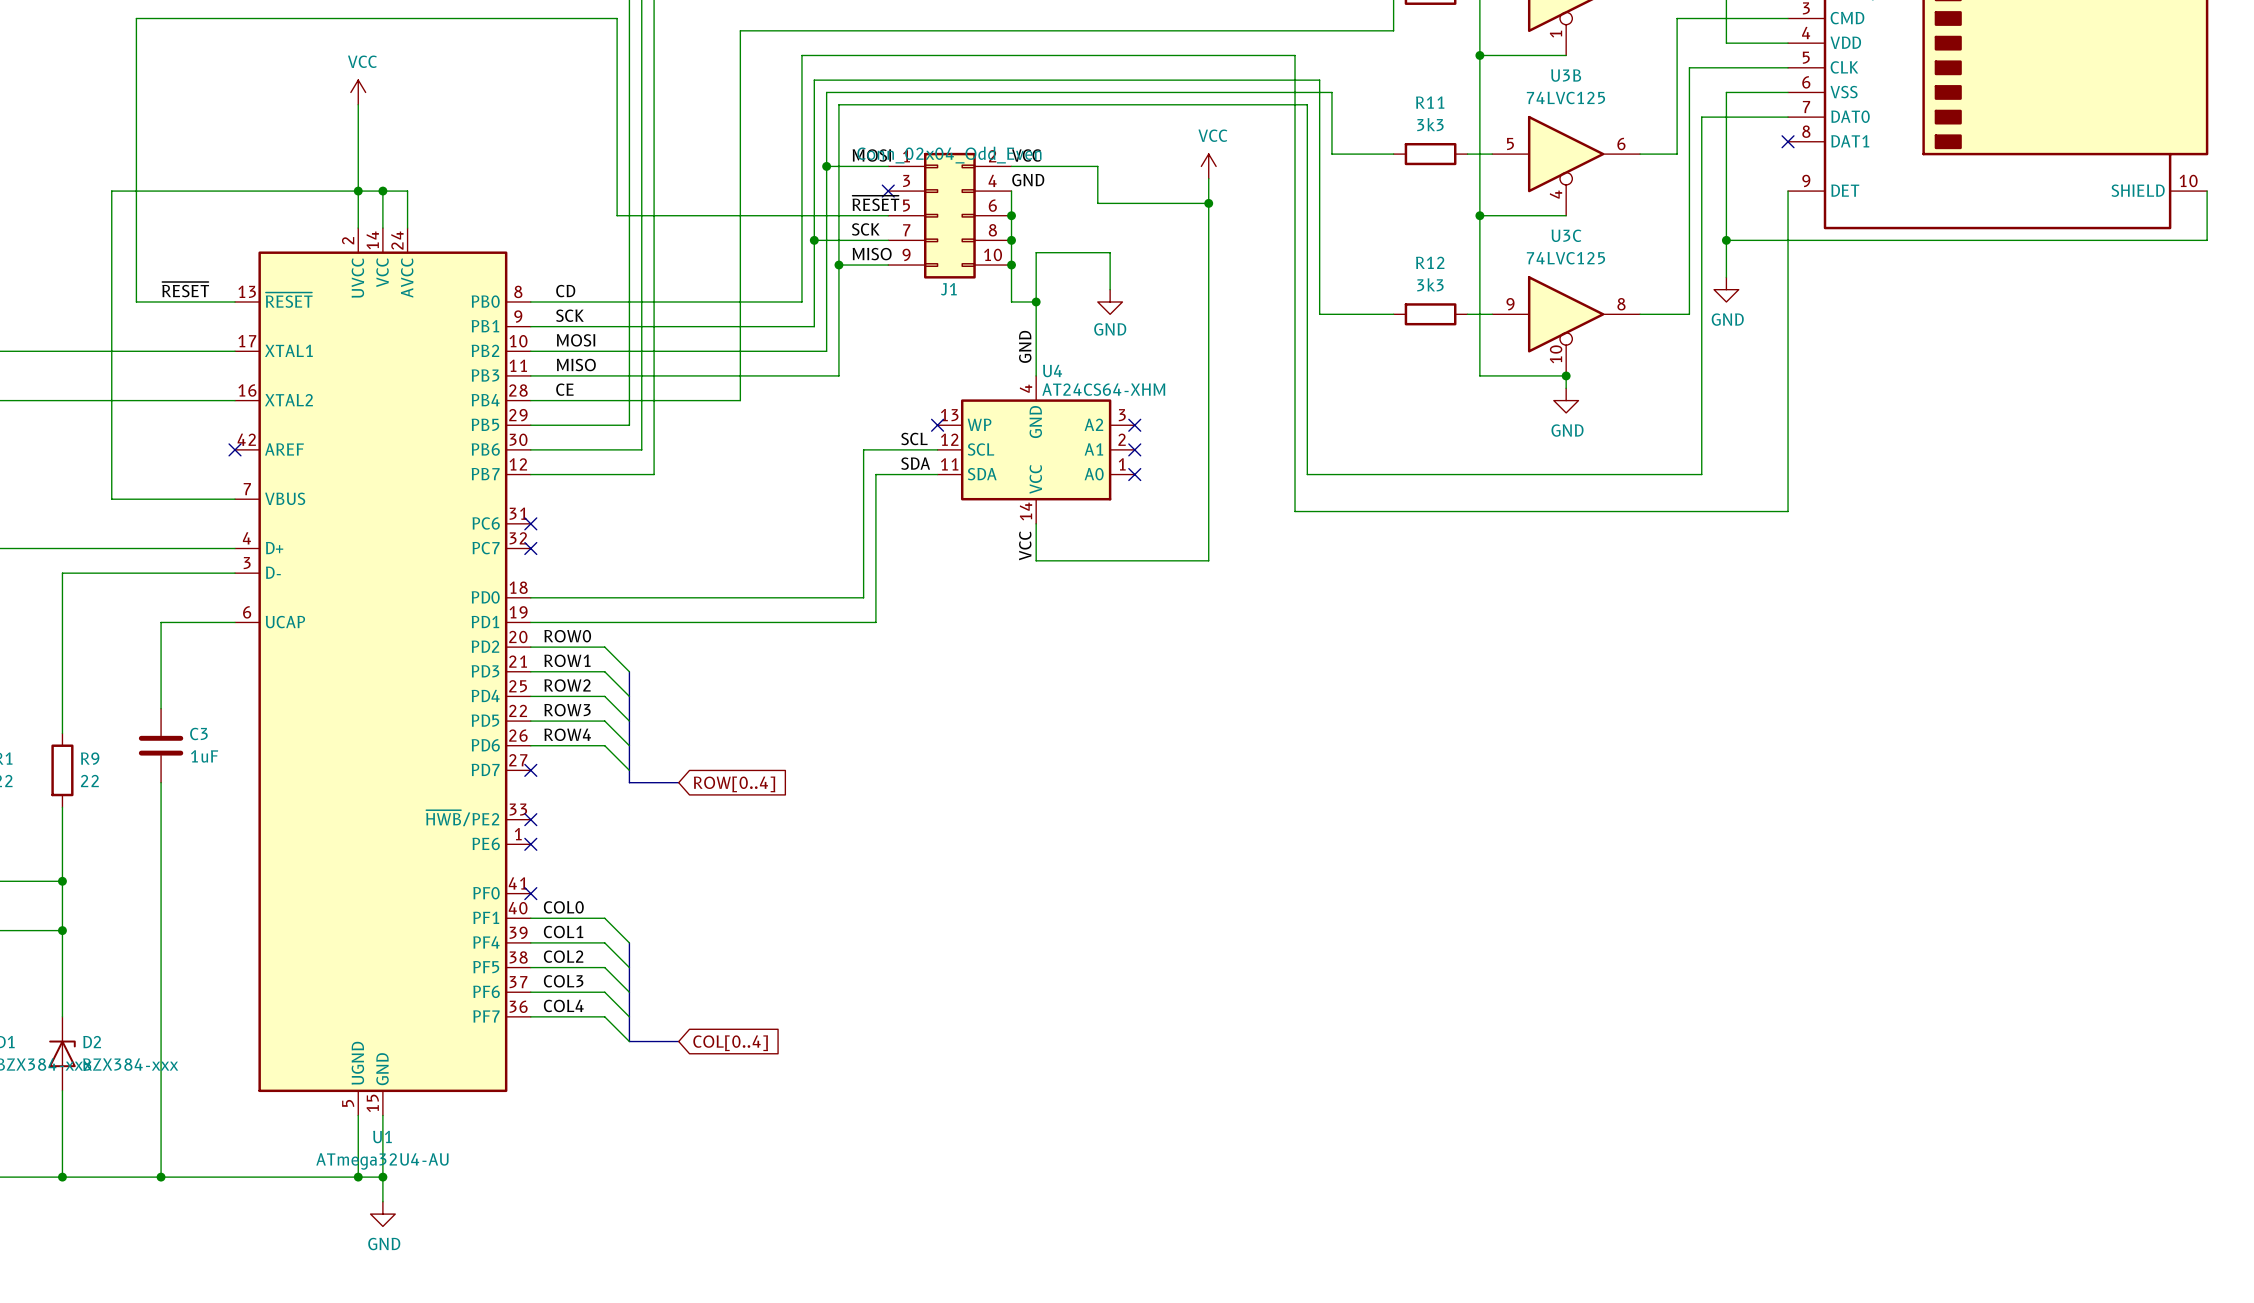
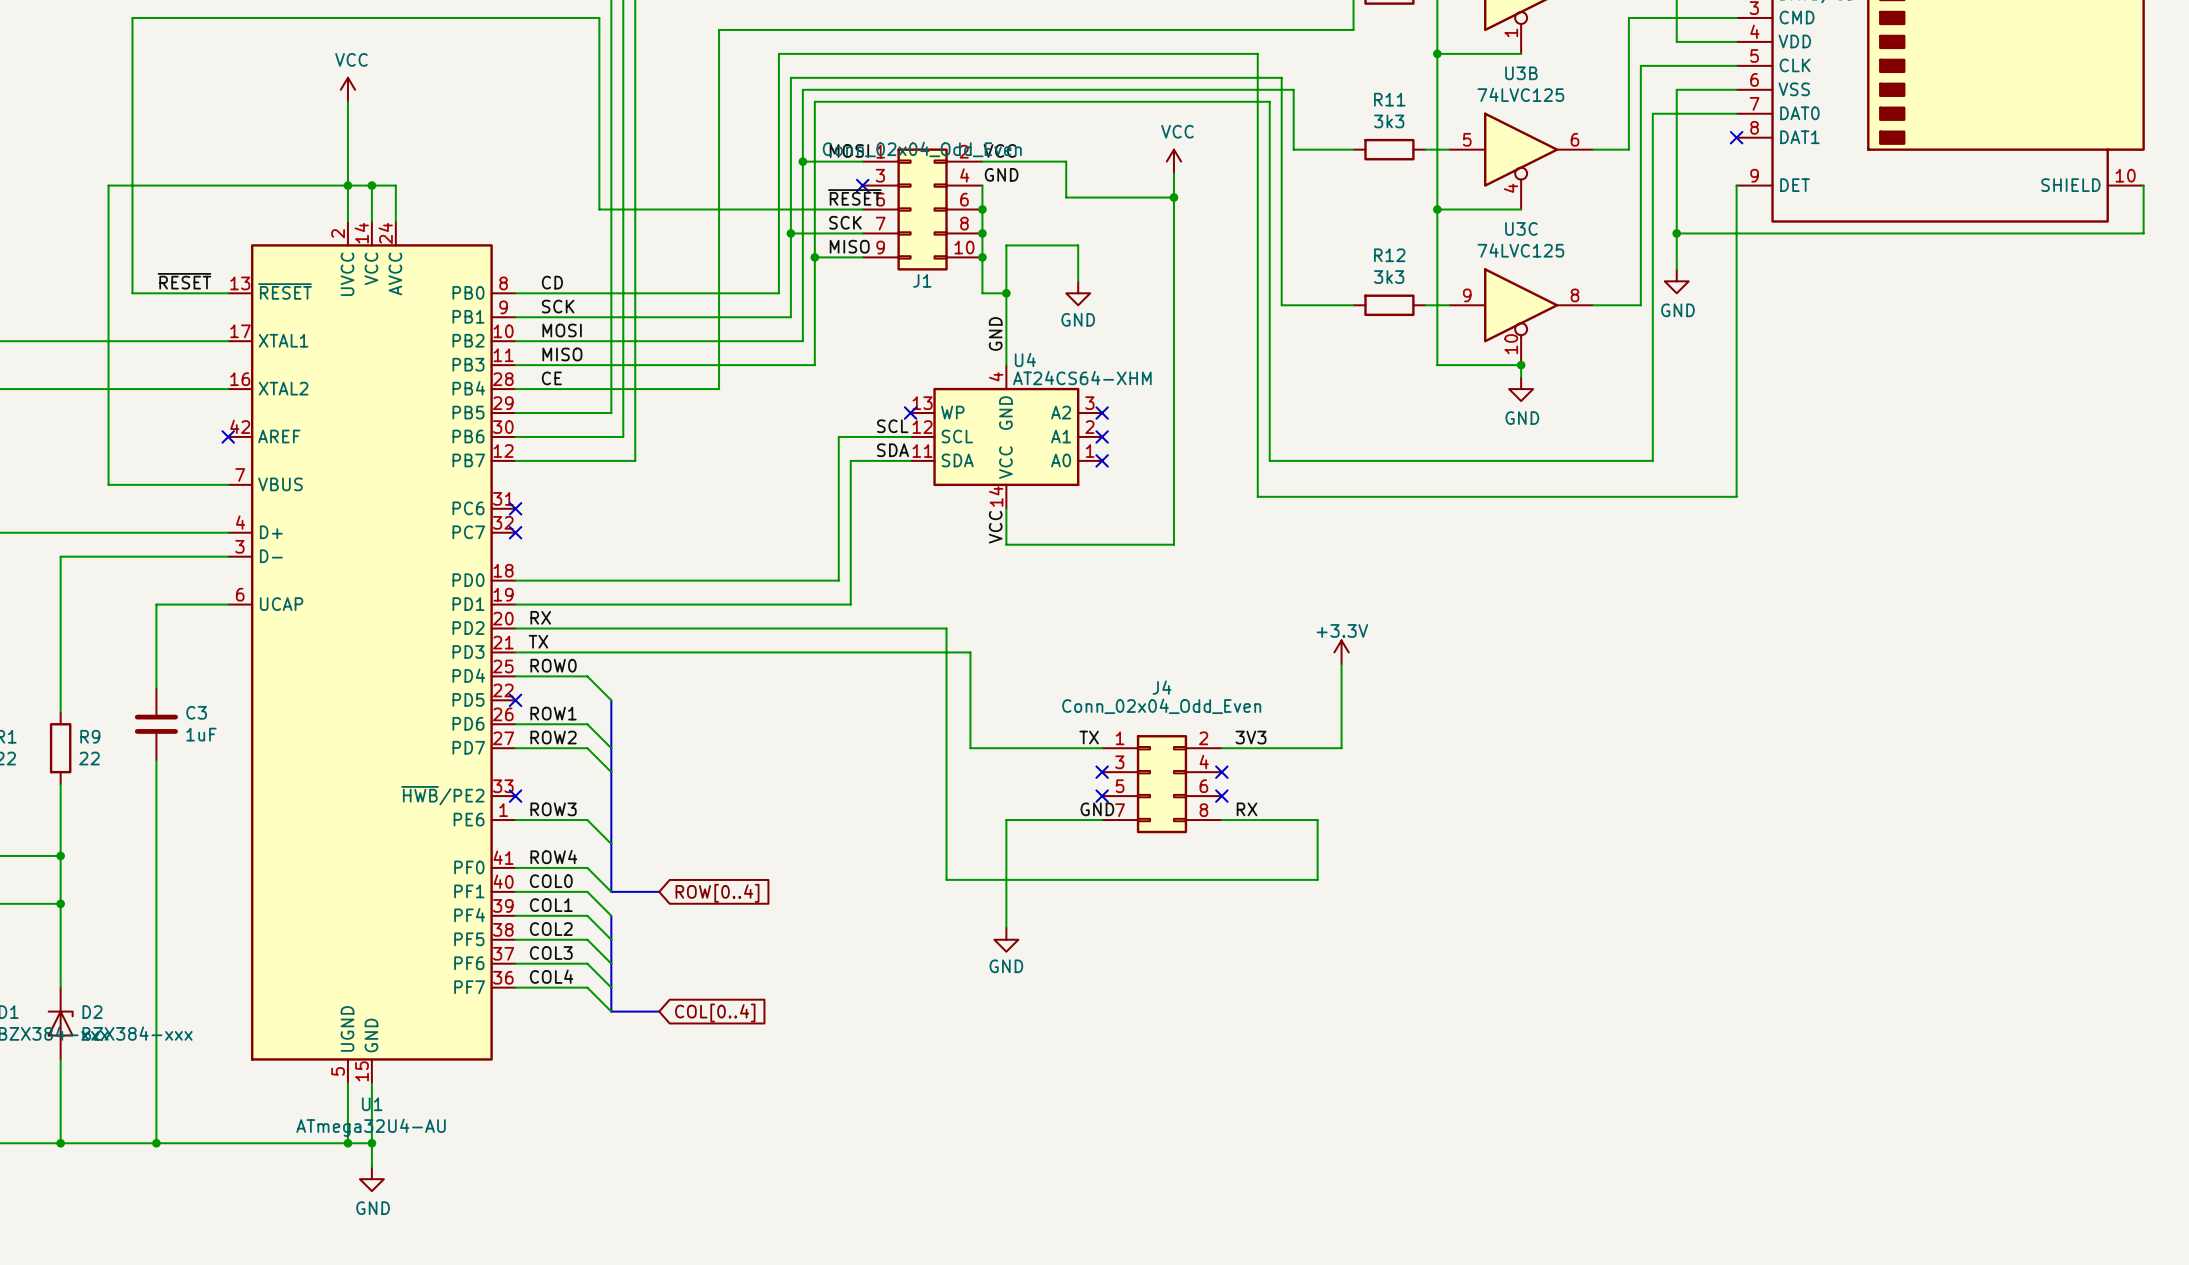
label: ROW0 (567, 636) -> RX (540, 617)
wire: (604, 647) (629, 671) -> (587, 628) (946, 628) (946, 879) (1317, 879) (1317, 820) (1221, 820)
label: ROW1 (567, 660) -> TX (538, 641)
wire: (604, 671) (629, 696) -> (587, 652) (970, 652) (970, 748) (1102, 748)
bus: (629, 671) (629, 721) -> none
power symbol: none -> +3.3V (1341, 652)
wire: none -> (1341, 664) (1341, 748) (1221, 748)
label: ROW2 (567, 685) -> ROW0 (553, 665)
label position: ROW3 (567, 710) -> ROW3 (553, 809)
wire: (530, 721) (604, 721) (629, 745) -> (515, 748) (587, 748) (611, 772)
label: ROW4 (567, 734) -> ROW1 (553, 713)
label: none -> ROW2 (553, 737)
label: none -> TX (1089, 737)
label: none -> 3V3 (1251, 737)
no-connect mark position: (530, 770) -> (515, 700)
bus: (629, 782) (678, 782) -> (611, 760) (611, 891) (659, 891)
global label position: ROW[0..4] (734, 784) -> ROW[0..4] (717, 893)
no-connect mark: none -> (1102, 772)
no-connect mark: none -> (1221, 772)
J4: none -> Conn_02x04_Odd_Even (1162, 784)
no-connect mark: none -> (1102, 796)
no-connect mark: none -> (1221, 796)
label: none -> GND (1097, 809)
label: none -> RX (1247, 809)
wire: none -> (515, 820) (587, 820) (611, 843)
no-connect mark: (530, 844) -> none
wire: none -> (1102, 820) (1006, 820) (1006, 927)
label: none -> ROW4 (553, 856)
wire: none -> (515, 867) (587, 867) (611, 891)
no-connect mark: (530, 893) -> none
power symbol: none -> GND (1006, 939)

